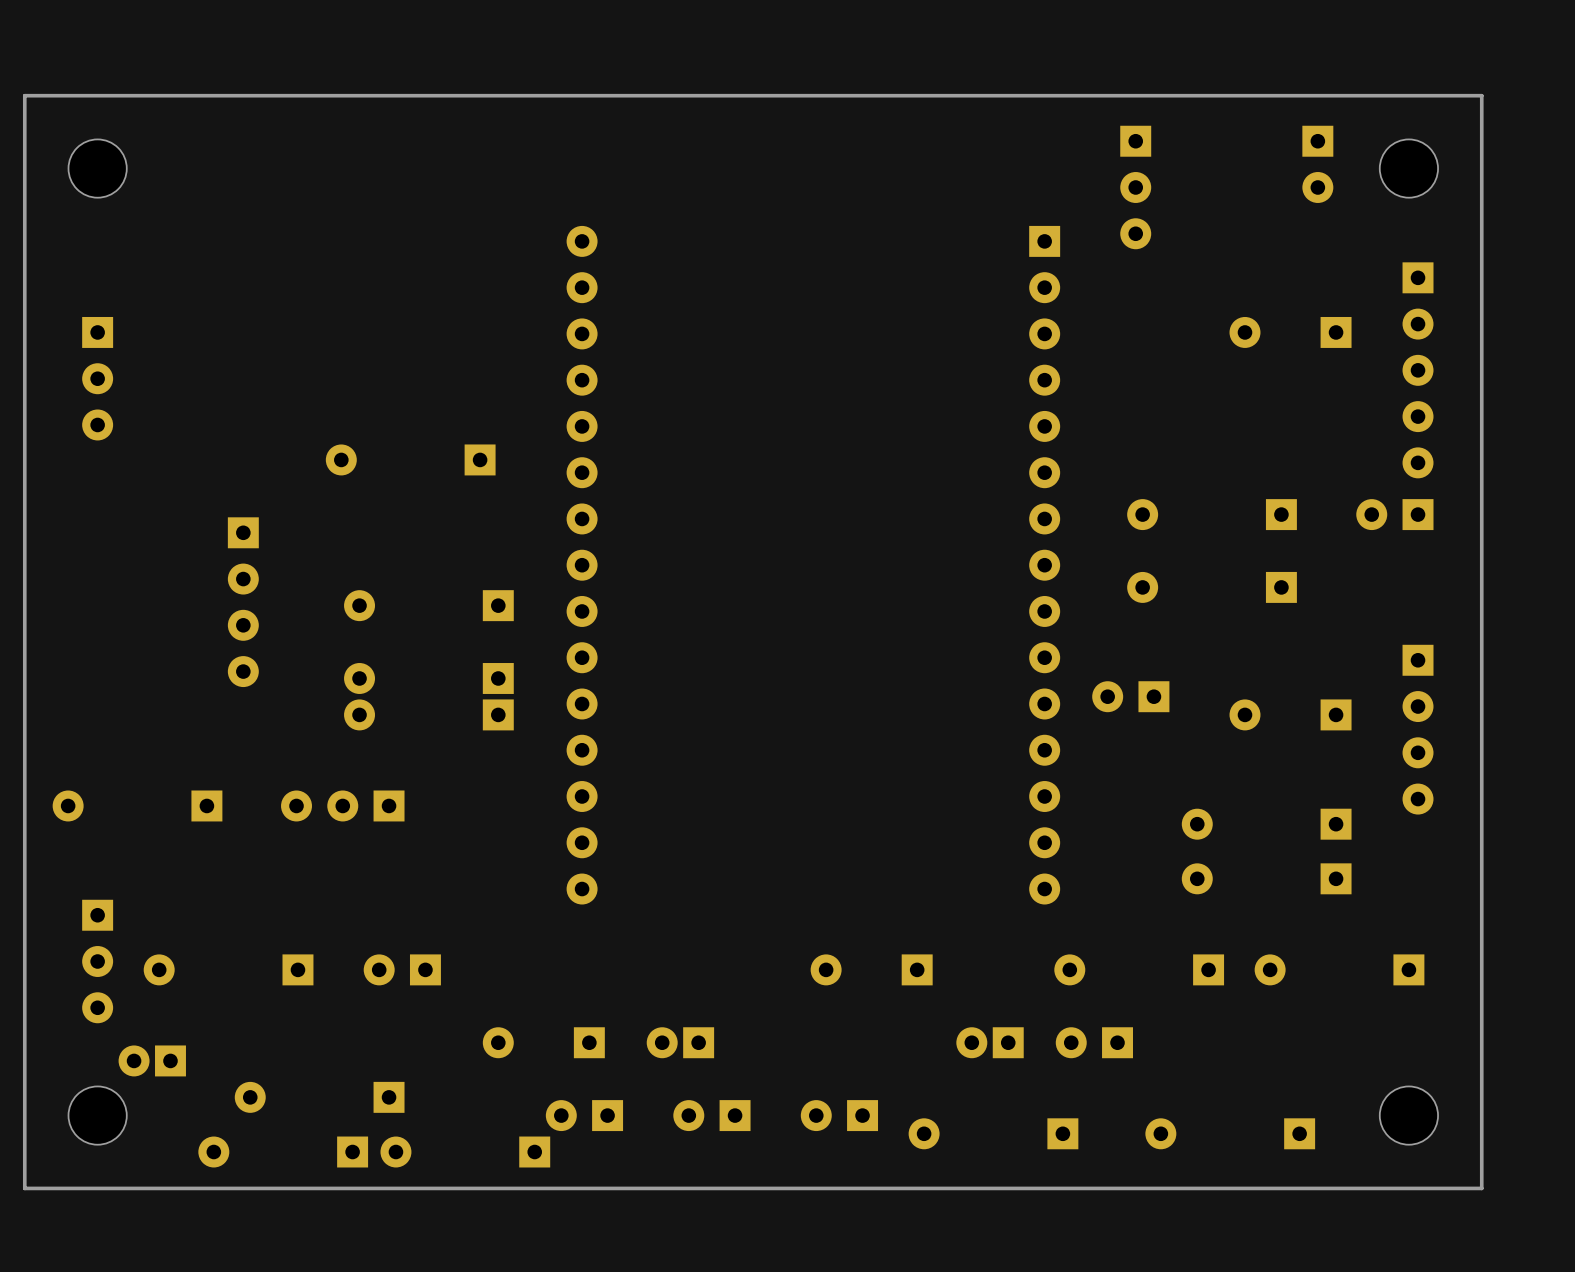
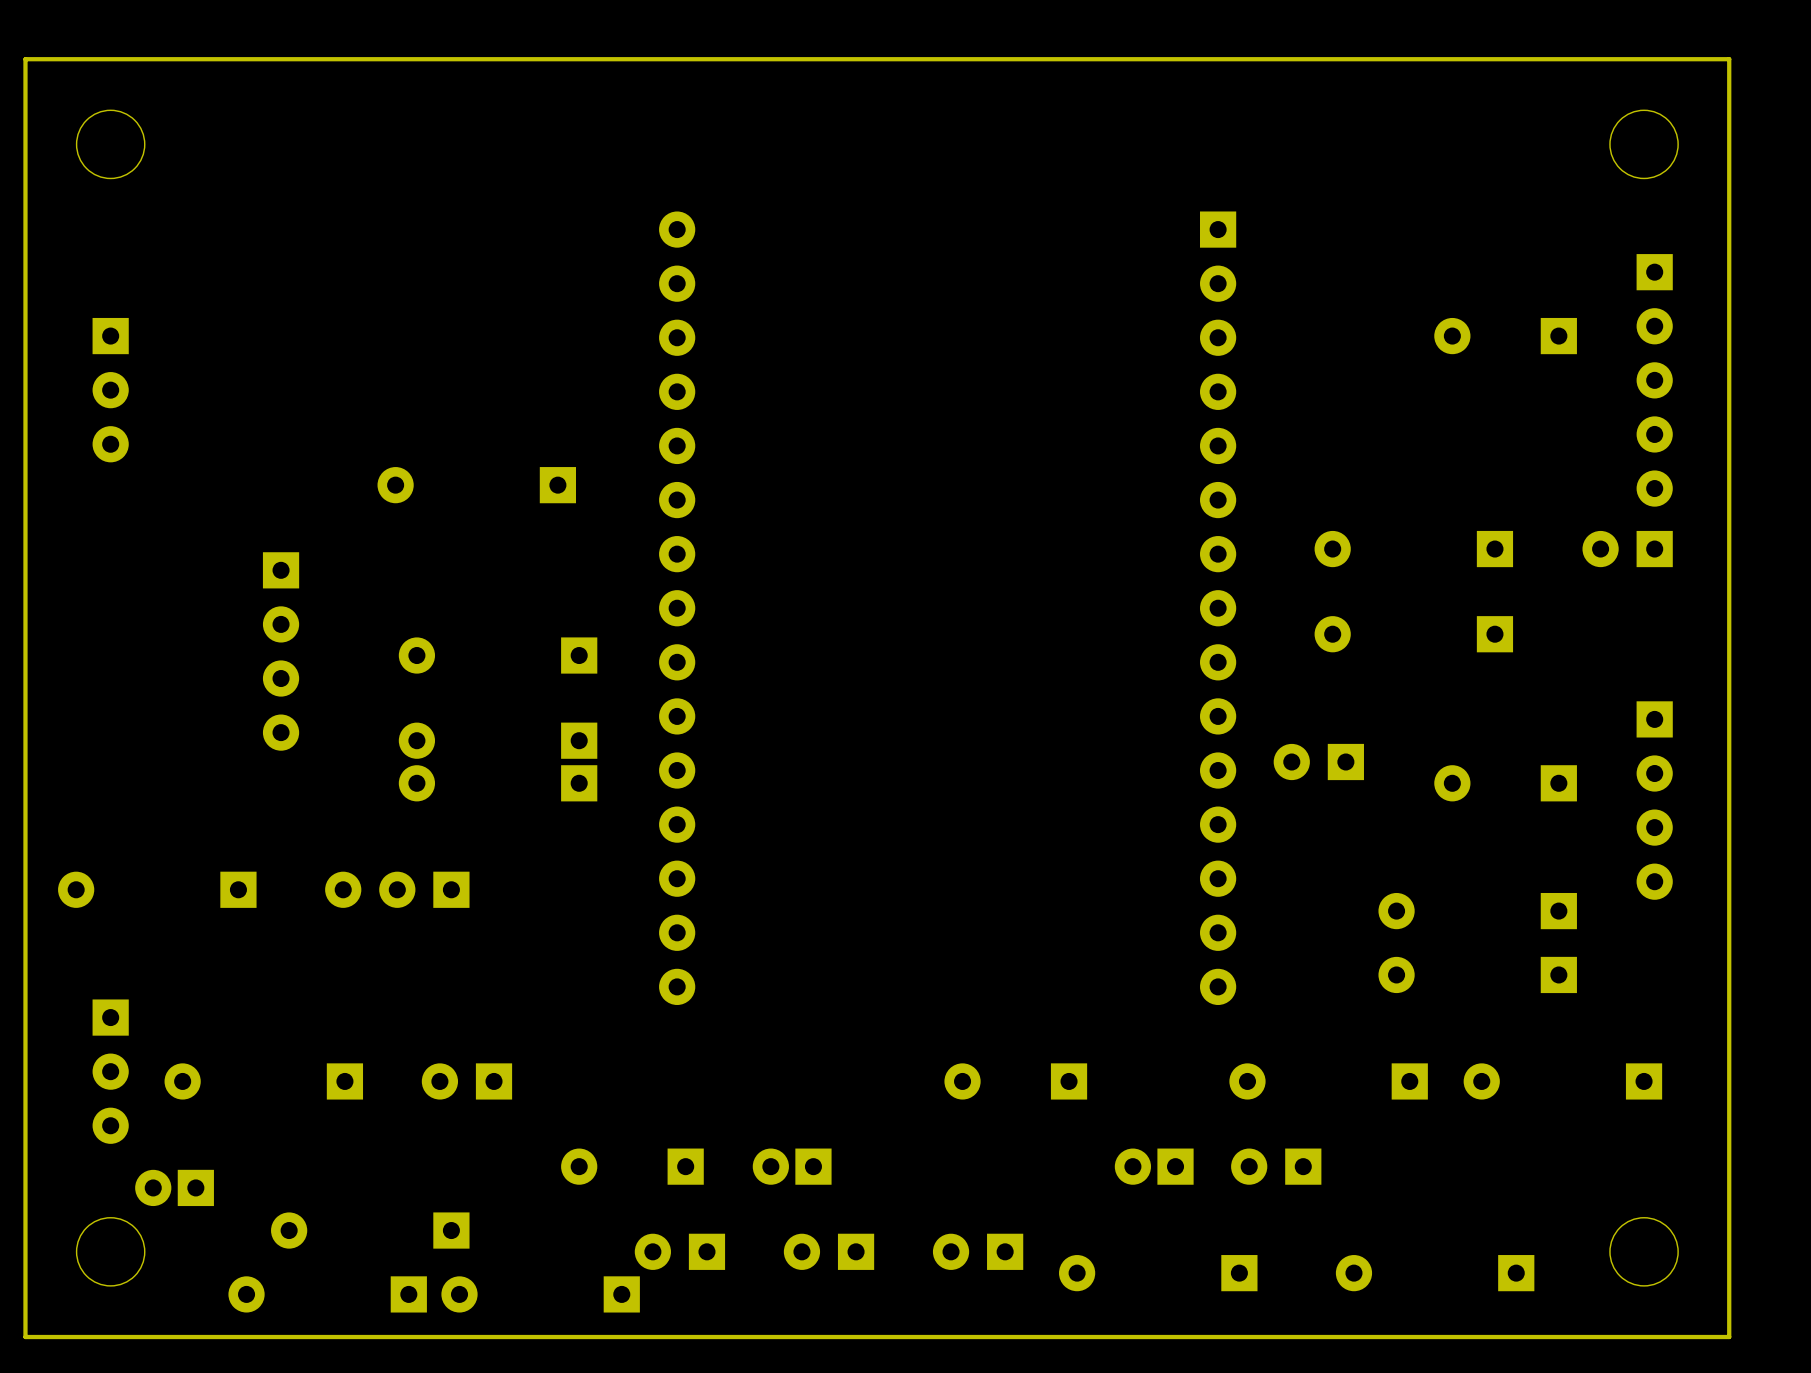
part: (1317, 164) -> none
part: (1135, 187) -> none

